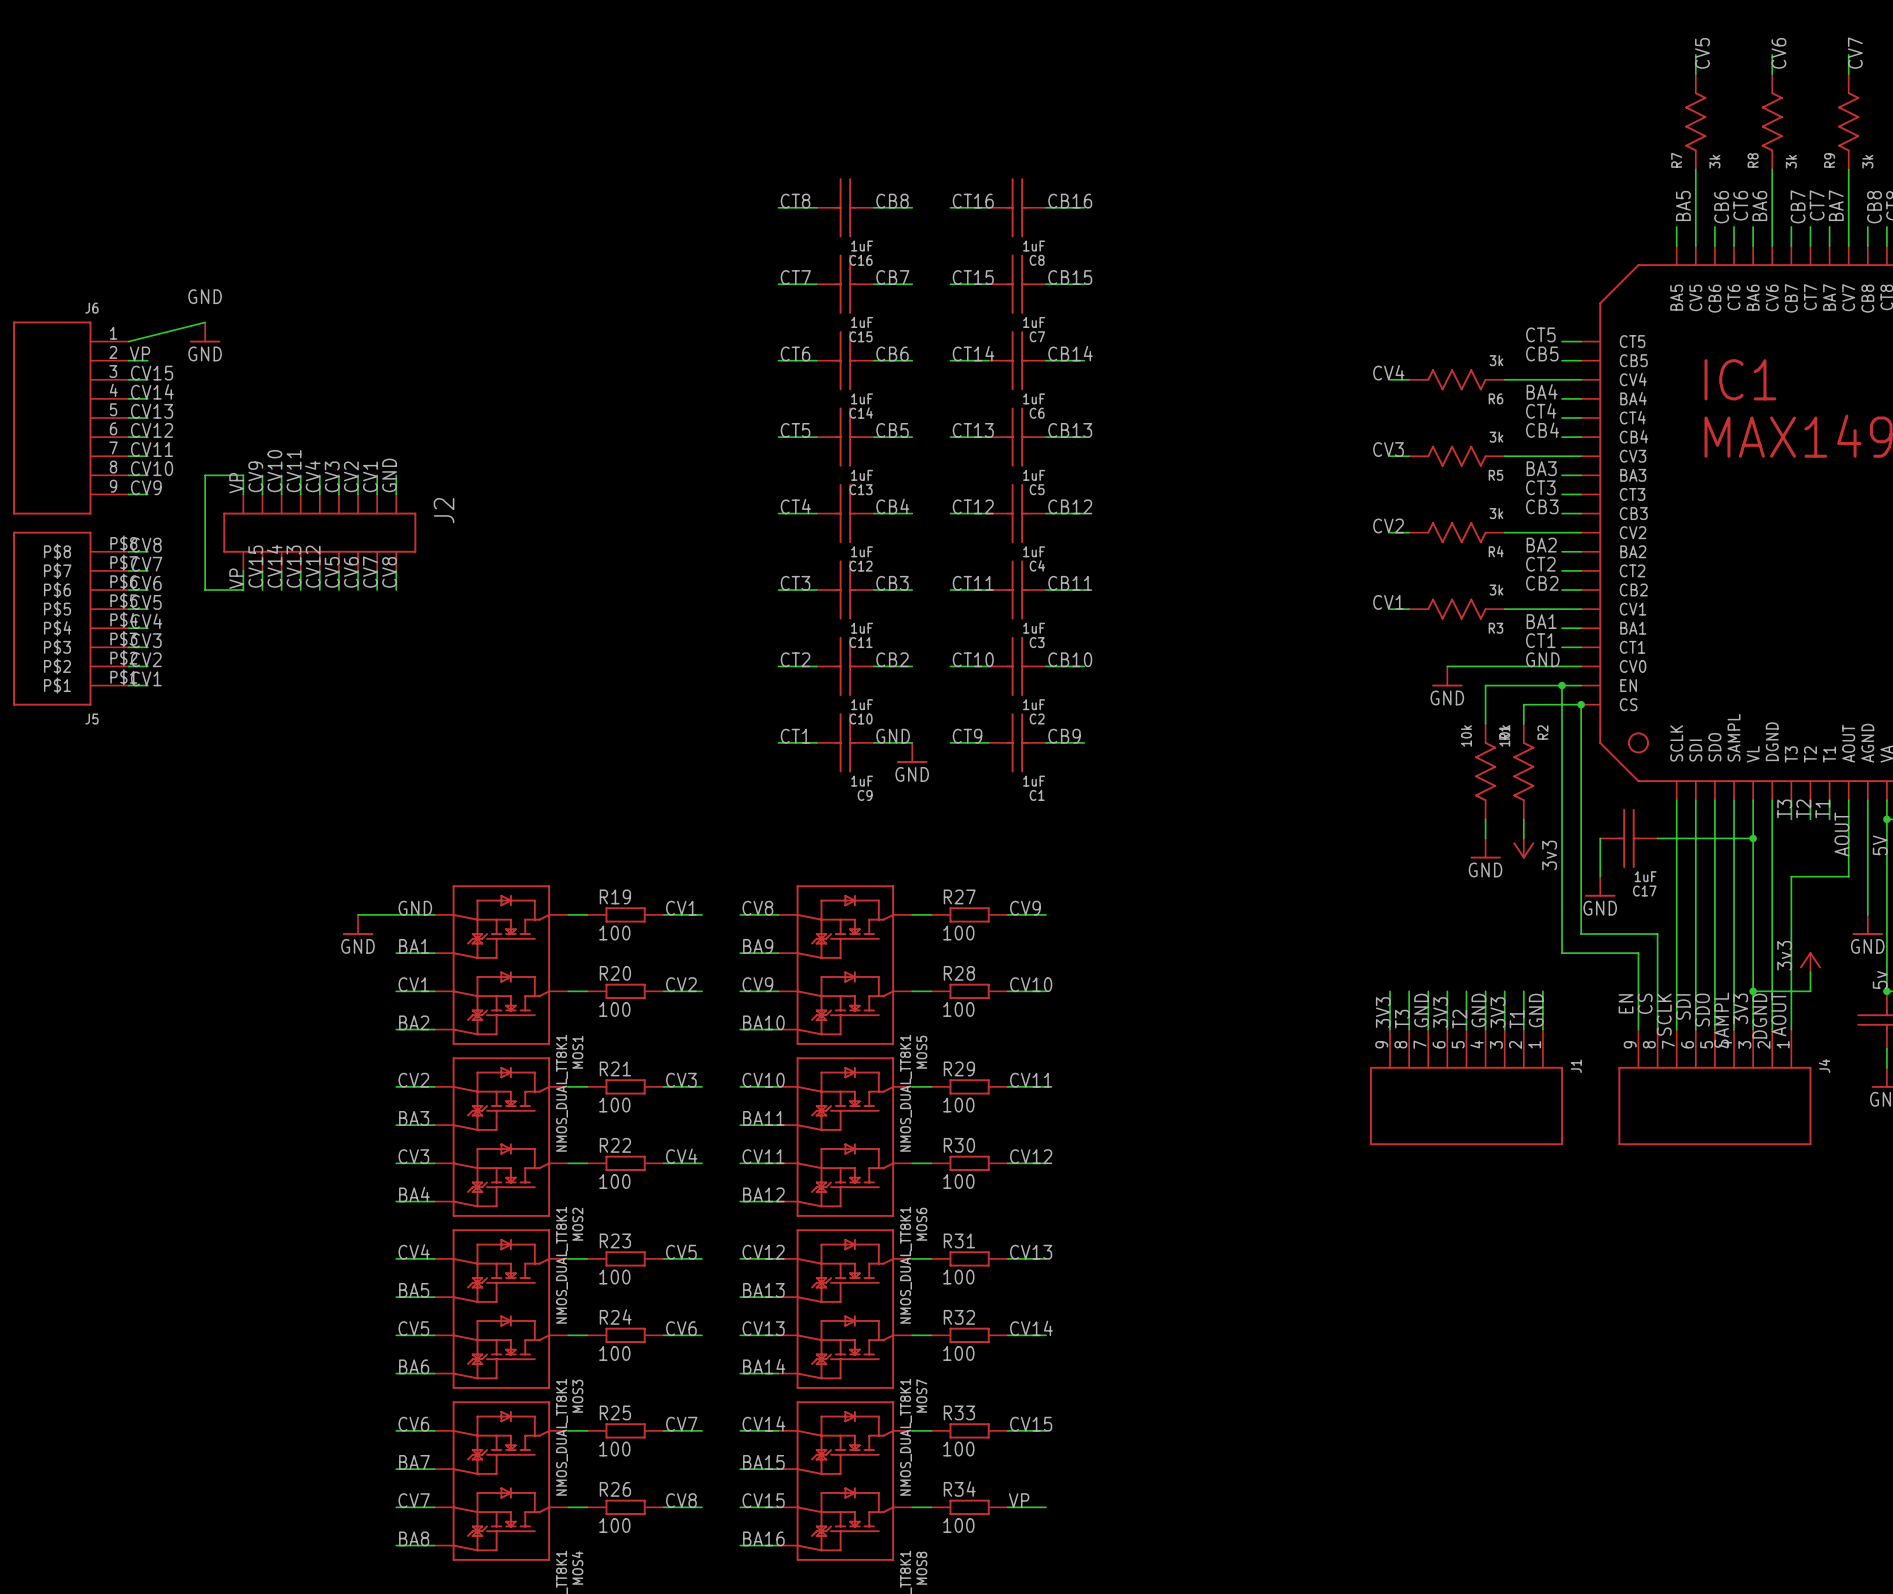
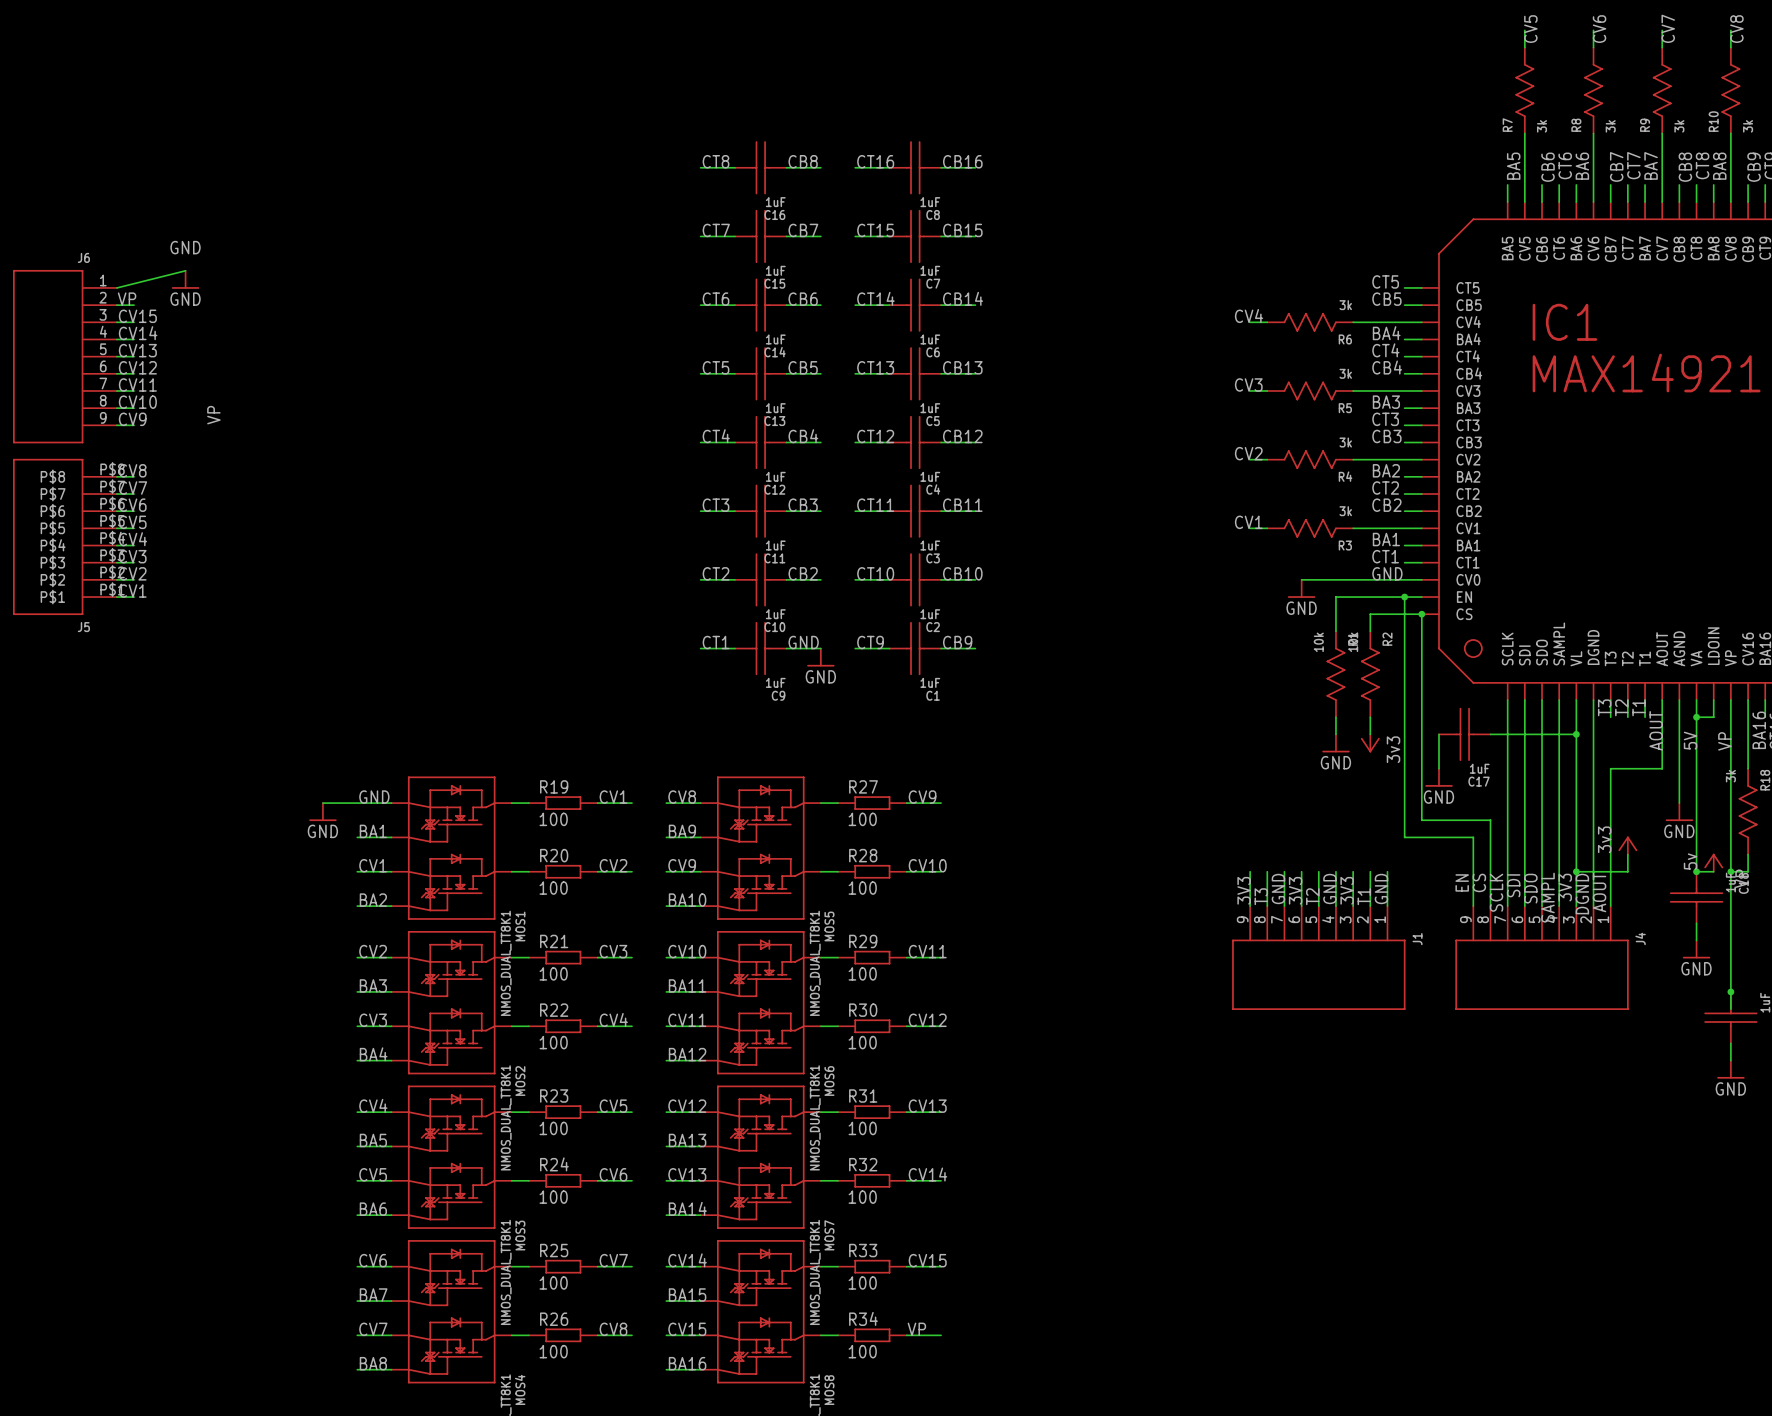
label: CV10 (274, 471) -> none
label: CV11 (294, 471) -> none
wire: (262, 475) (262, 494) -> none
wire: (281, 475) (281, 494) -> none
wire: (300, 475) (300, 494) -> none
wire: (319, 475) (319, 494) -> none
wire: (338, 475) (338, 494) -> none
wire: (358, 475) (358, 494) -> none
wire: (377, 475) (377, 494) -> none
label: GND (389, 475) -> none
wire: (396, 475) (396, 494) -> none
label: CV9 (255, 476) -> none
label: CV4 (312, 476) -> none
label: CV3 (332, 476) -> none
label: CV2 (351, 476) -> none
label: CV1 (370, 476) -> none
wire: (243, 494) (243, 475) (205, 475) (205, 590) (243, 590) (243, 570) -> none
J2: (319, 532) -> none
label: CV15 (255, 566) -> none
label: CV14 (274, 566) -> none
label: CV13 (294, 566) -> none
label: CV12 (313, 566) -> none
wire: (262, 570) (262, 590) -> none
wire: (281, 570) (281, 590) -> none
wire: (300, 570) (300, 590) -> none
wire: (319, 570) (319, 590) -> none
wire: (338, 570) (338, 590) -> none
wire: (358, 570) (358, 590) -> none
wire: (377, 570) (377, 590) -> none
wire: (396, 570) (396, 590) -> none
label: CV5 (332, 572) -> none
label: CV6 (351, 572) -> none
label: CV7 (370, 572) -> none
label: CV8 (389, 572) -> none
label: VP (236, 578) -> none

